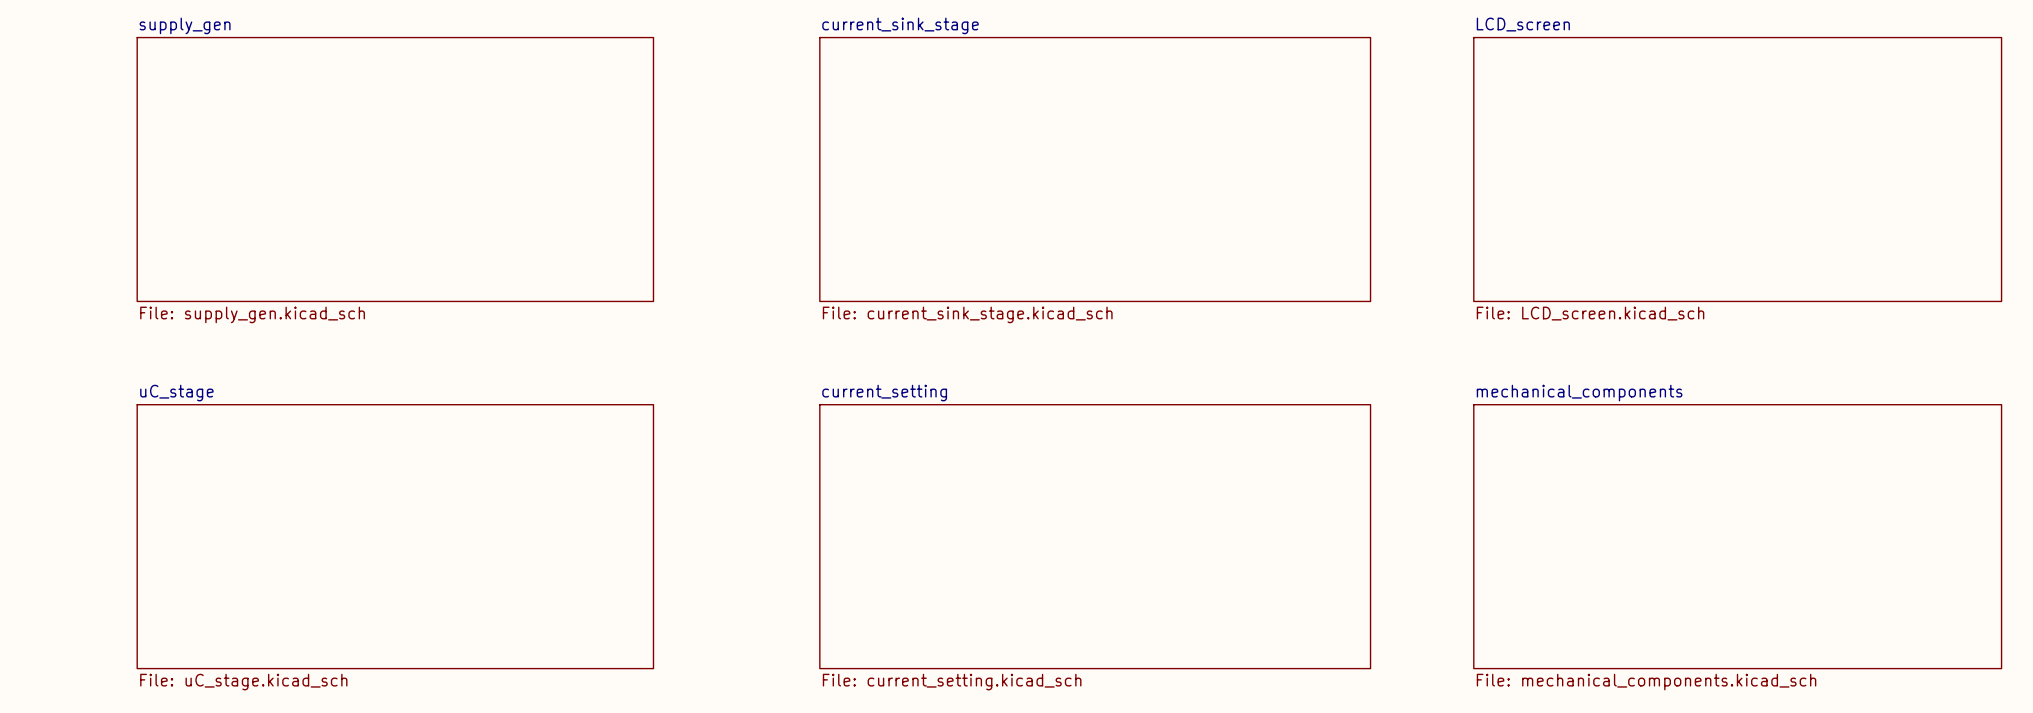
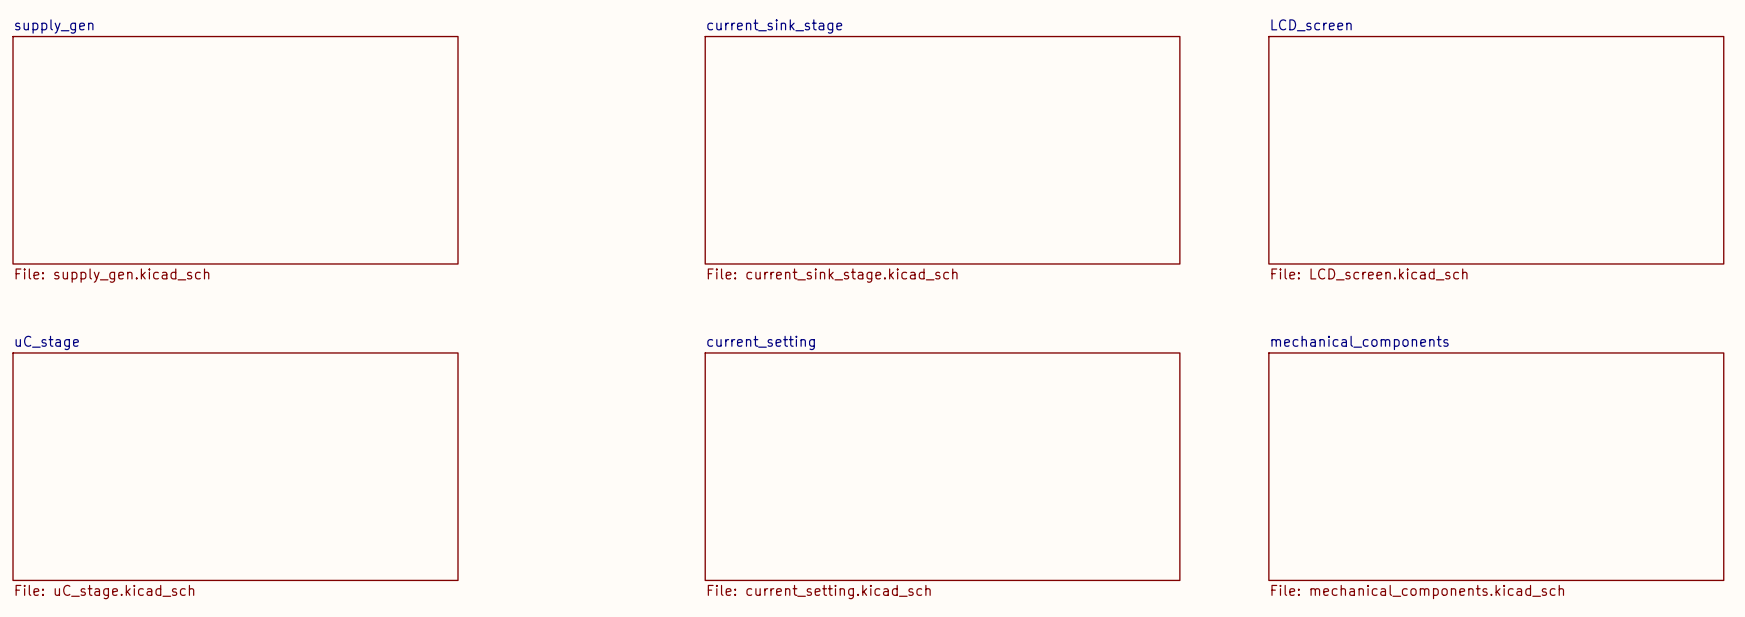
sheet supply_gen position: (395, 169) -> (235, 150)
sheet uC_stage position: (395, 536) -> (235, 466)

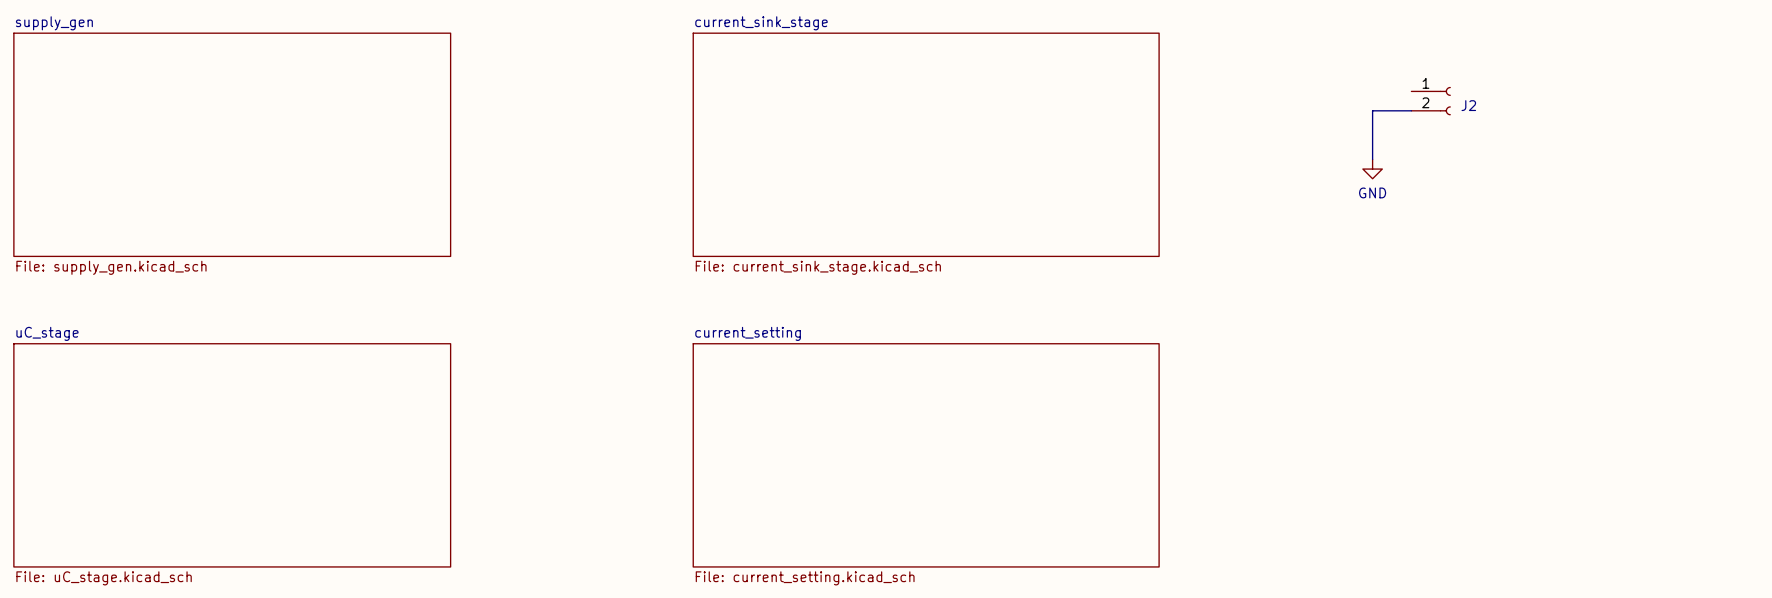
J2: none -> (1431, 101)
wire: none -> (1411, 110) (1372, 110) (1372, 159)
sheet LCD_screen: File: LCD_screen.kicad_sch (1496, 150) -> none
power symbol: none -> GND (1372, 169)
sheet mechanical_components: File: mechanical_components.kicad_sch (1496, 466) -> none

